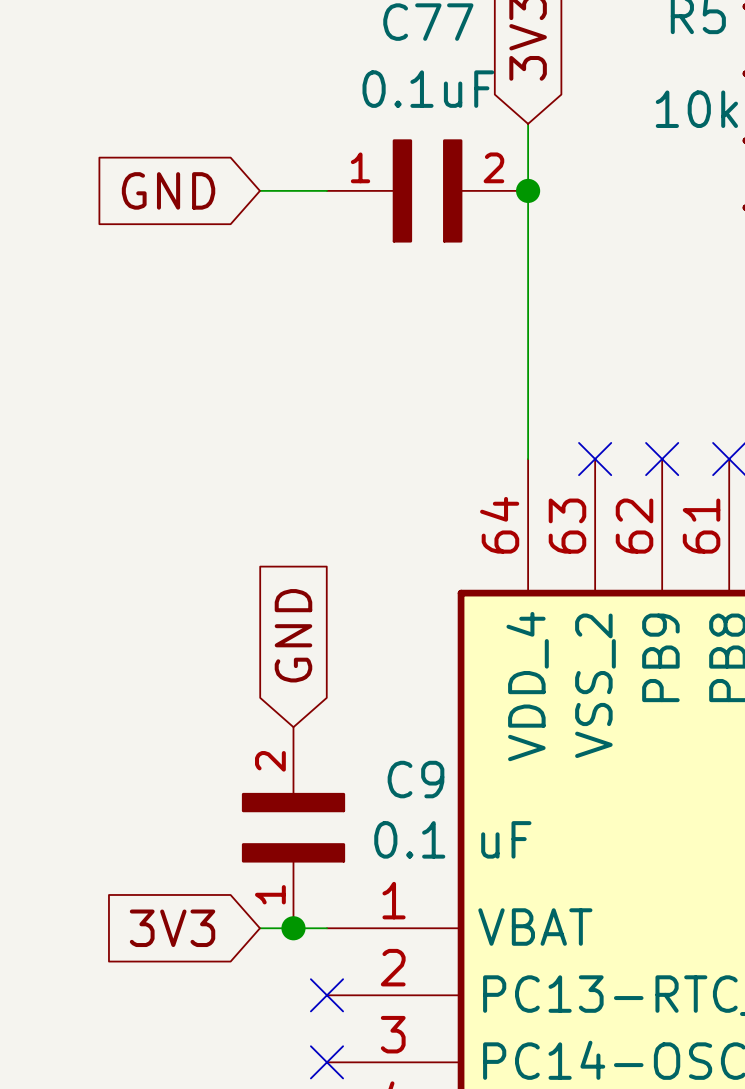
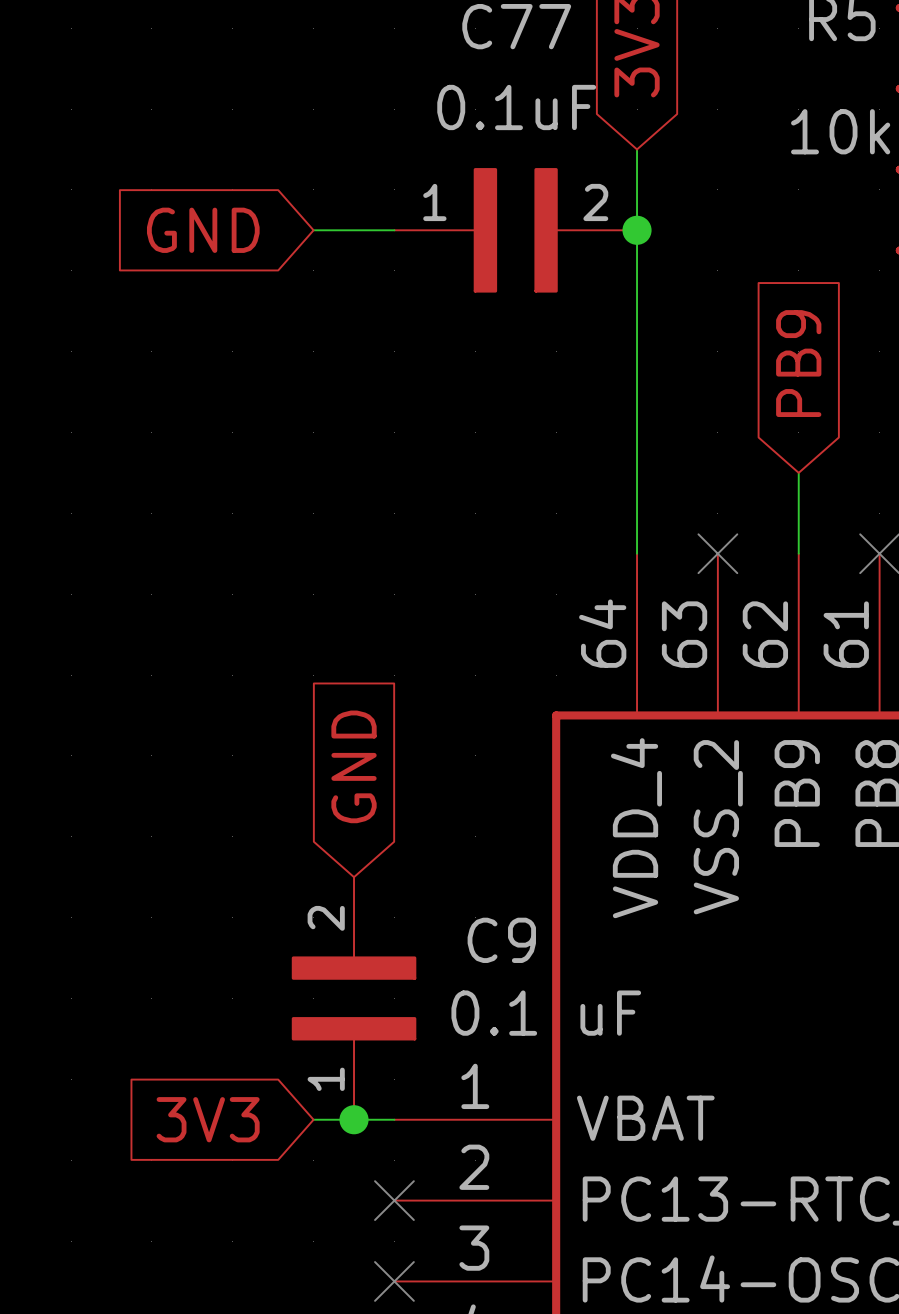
global label: none -> PB9 (798, 363)
wire: none -> (798, 472) (798, 553)
no-connect mark: (662, 459) -> none

